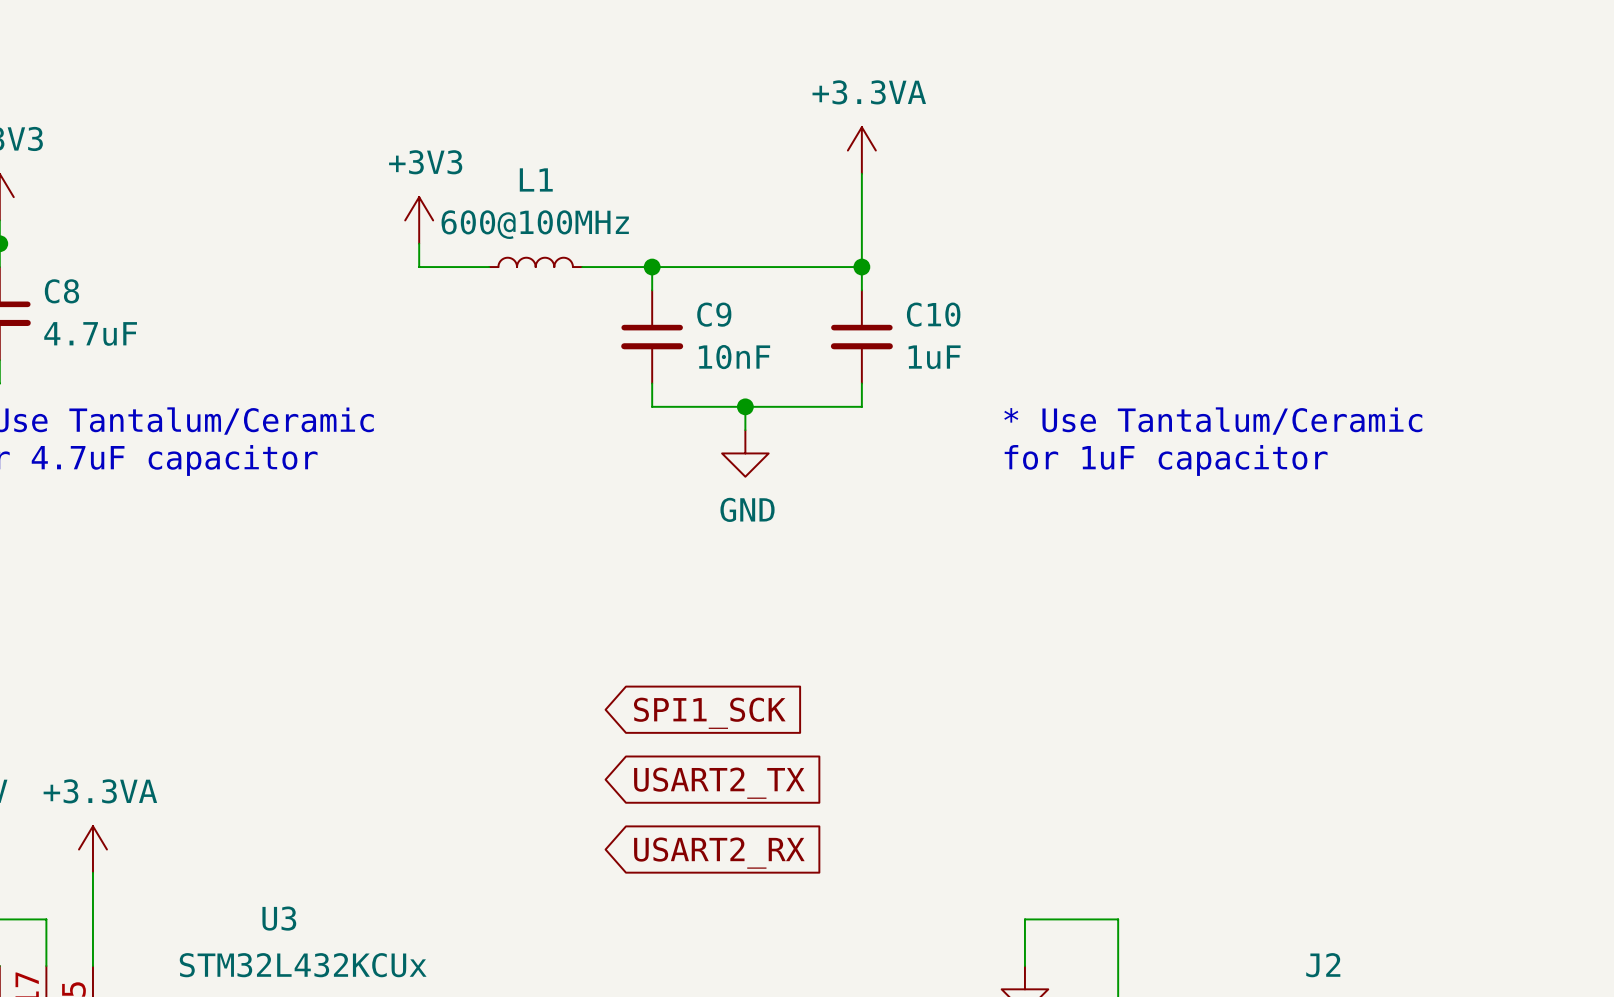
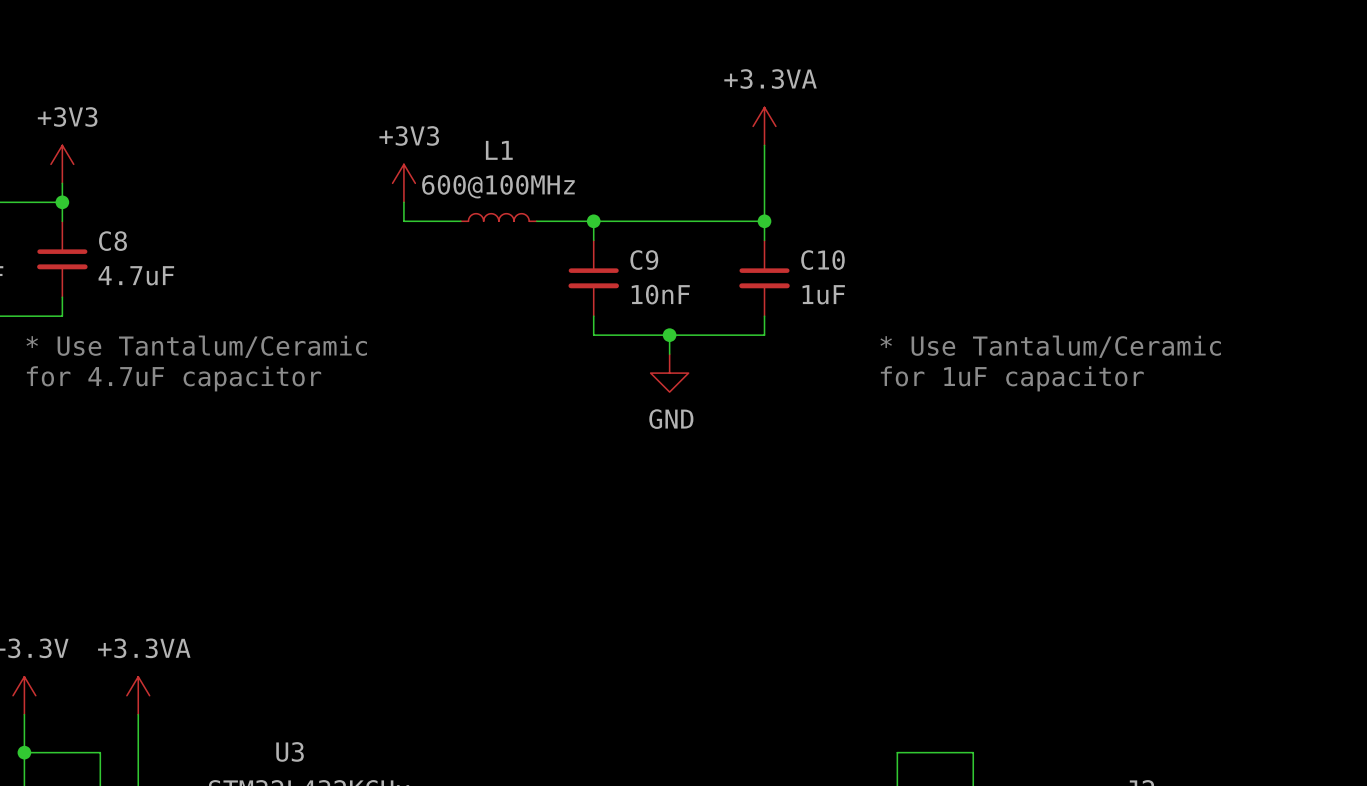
global label: SPI1_SCK (709, 713) -> none
global label: USART2_TX (719, 783) -> none
global label: USART2_RX (719, 853) -> none

